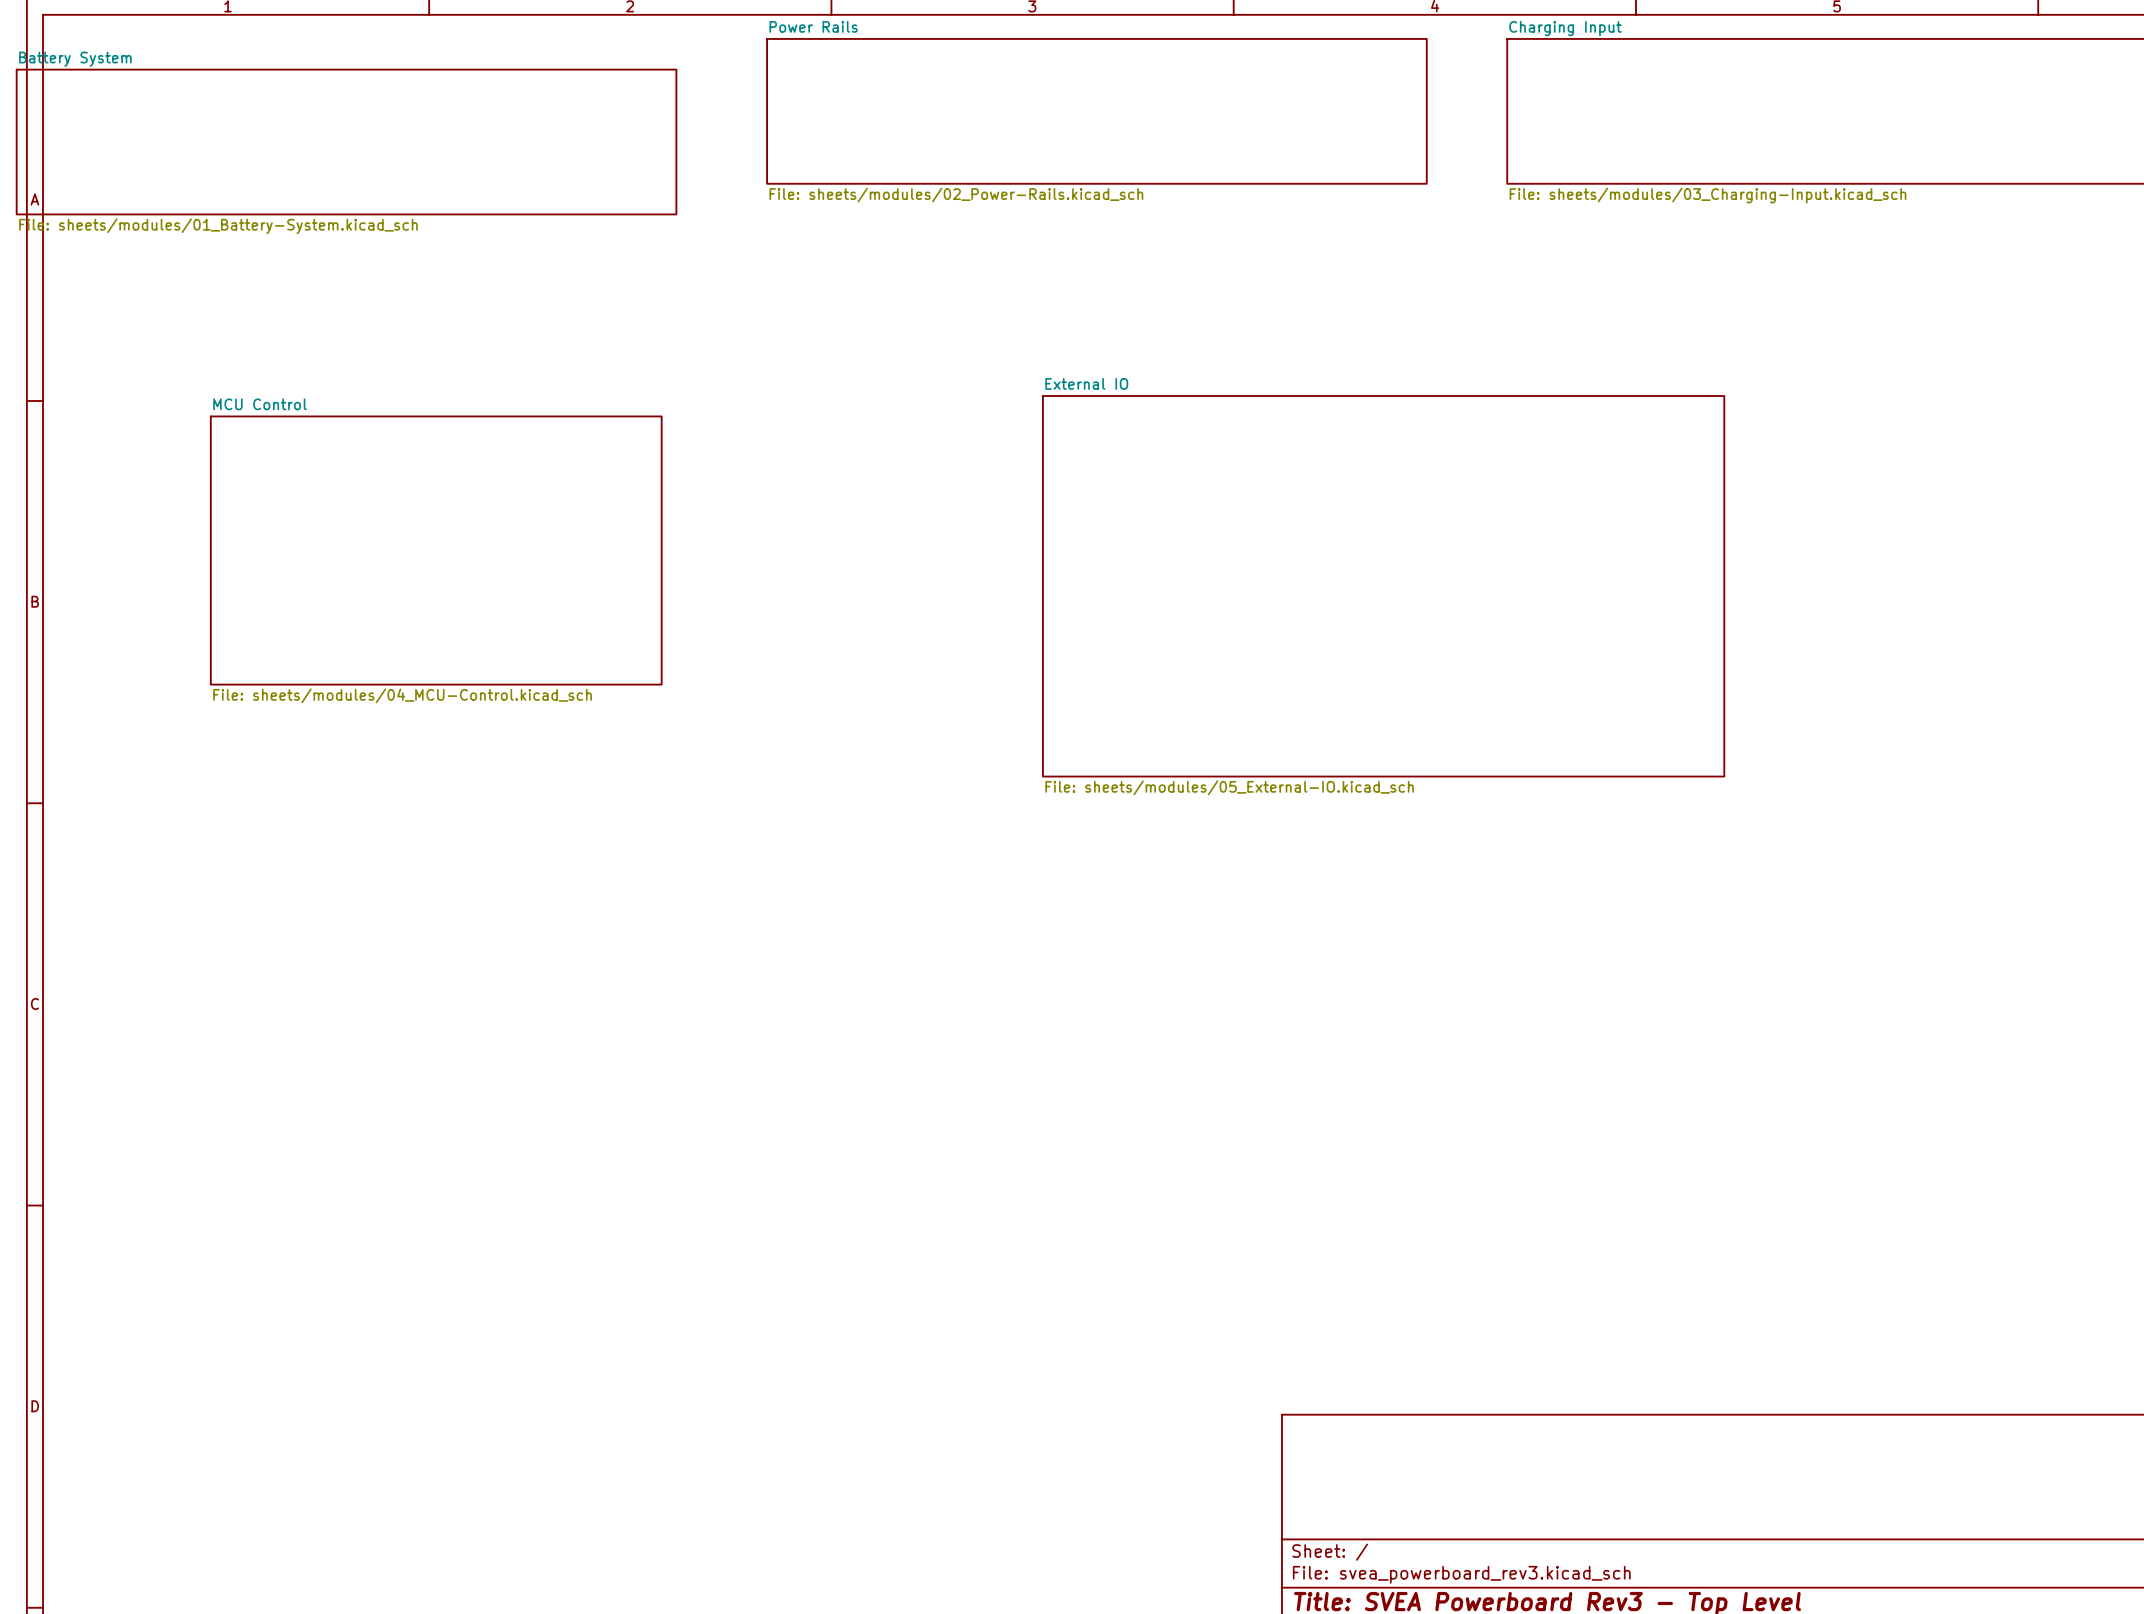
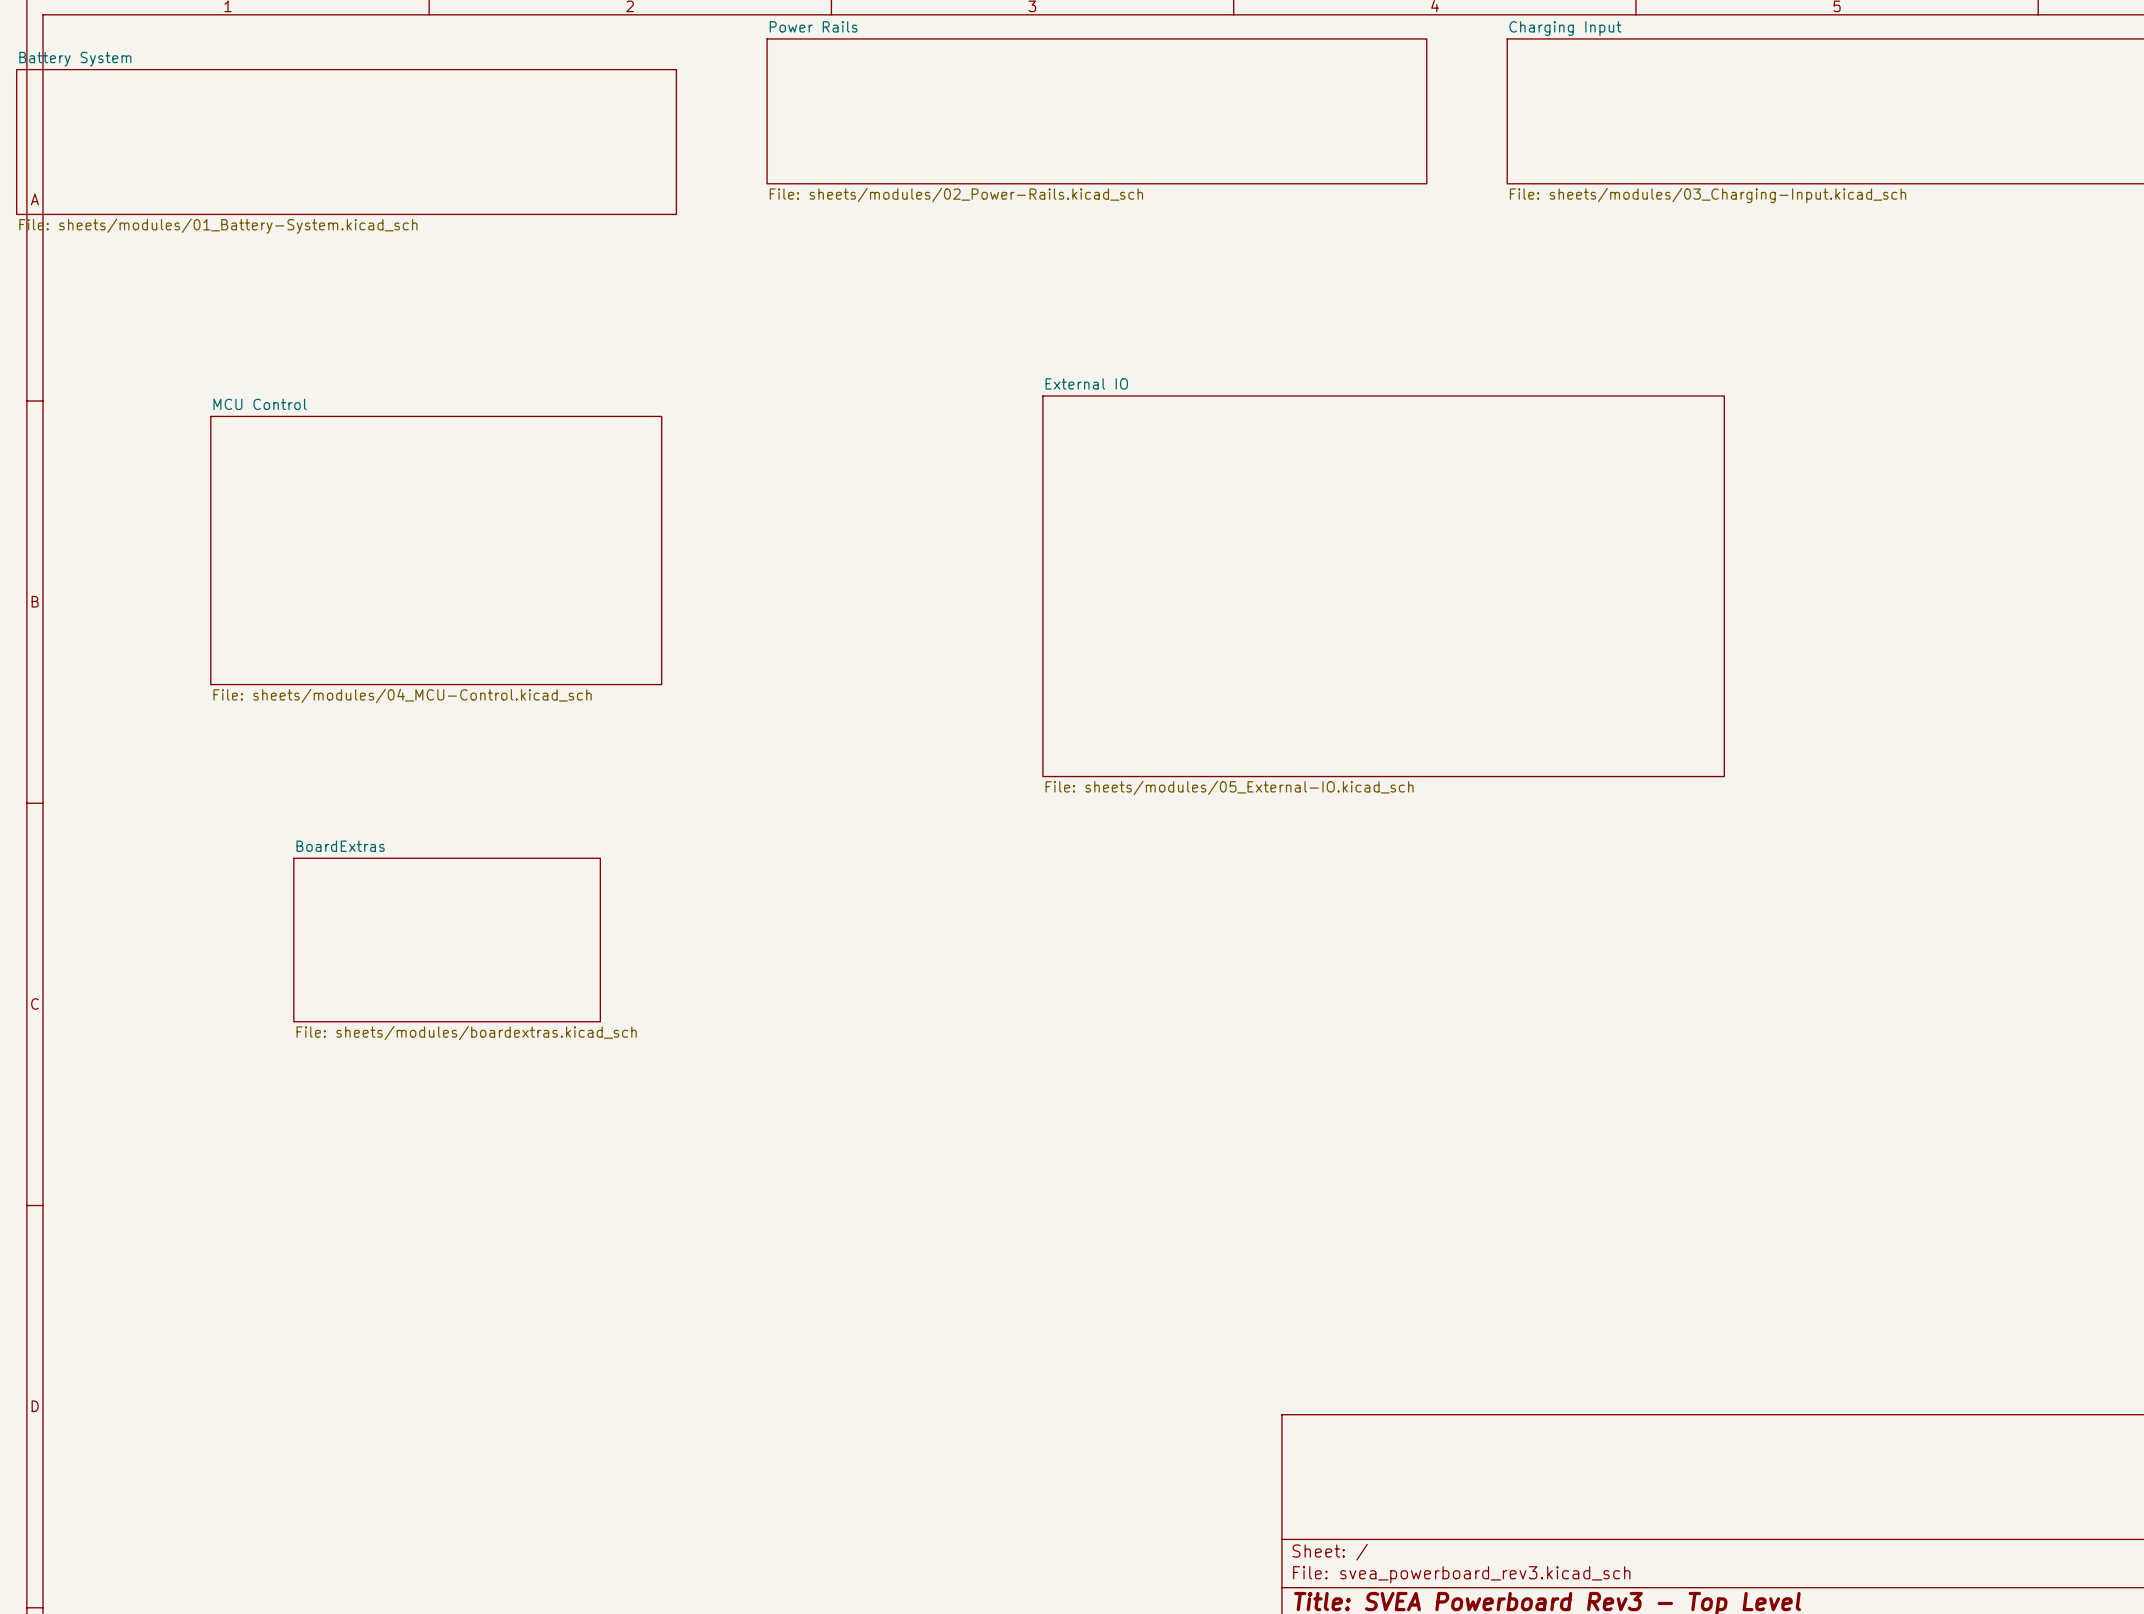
sheet BoardExtras: none -> File: sheets/modules/boardextras.kicad_sch (447, 940)

